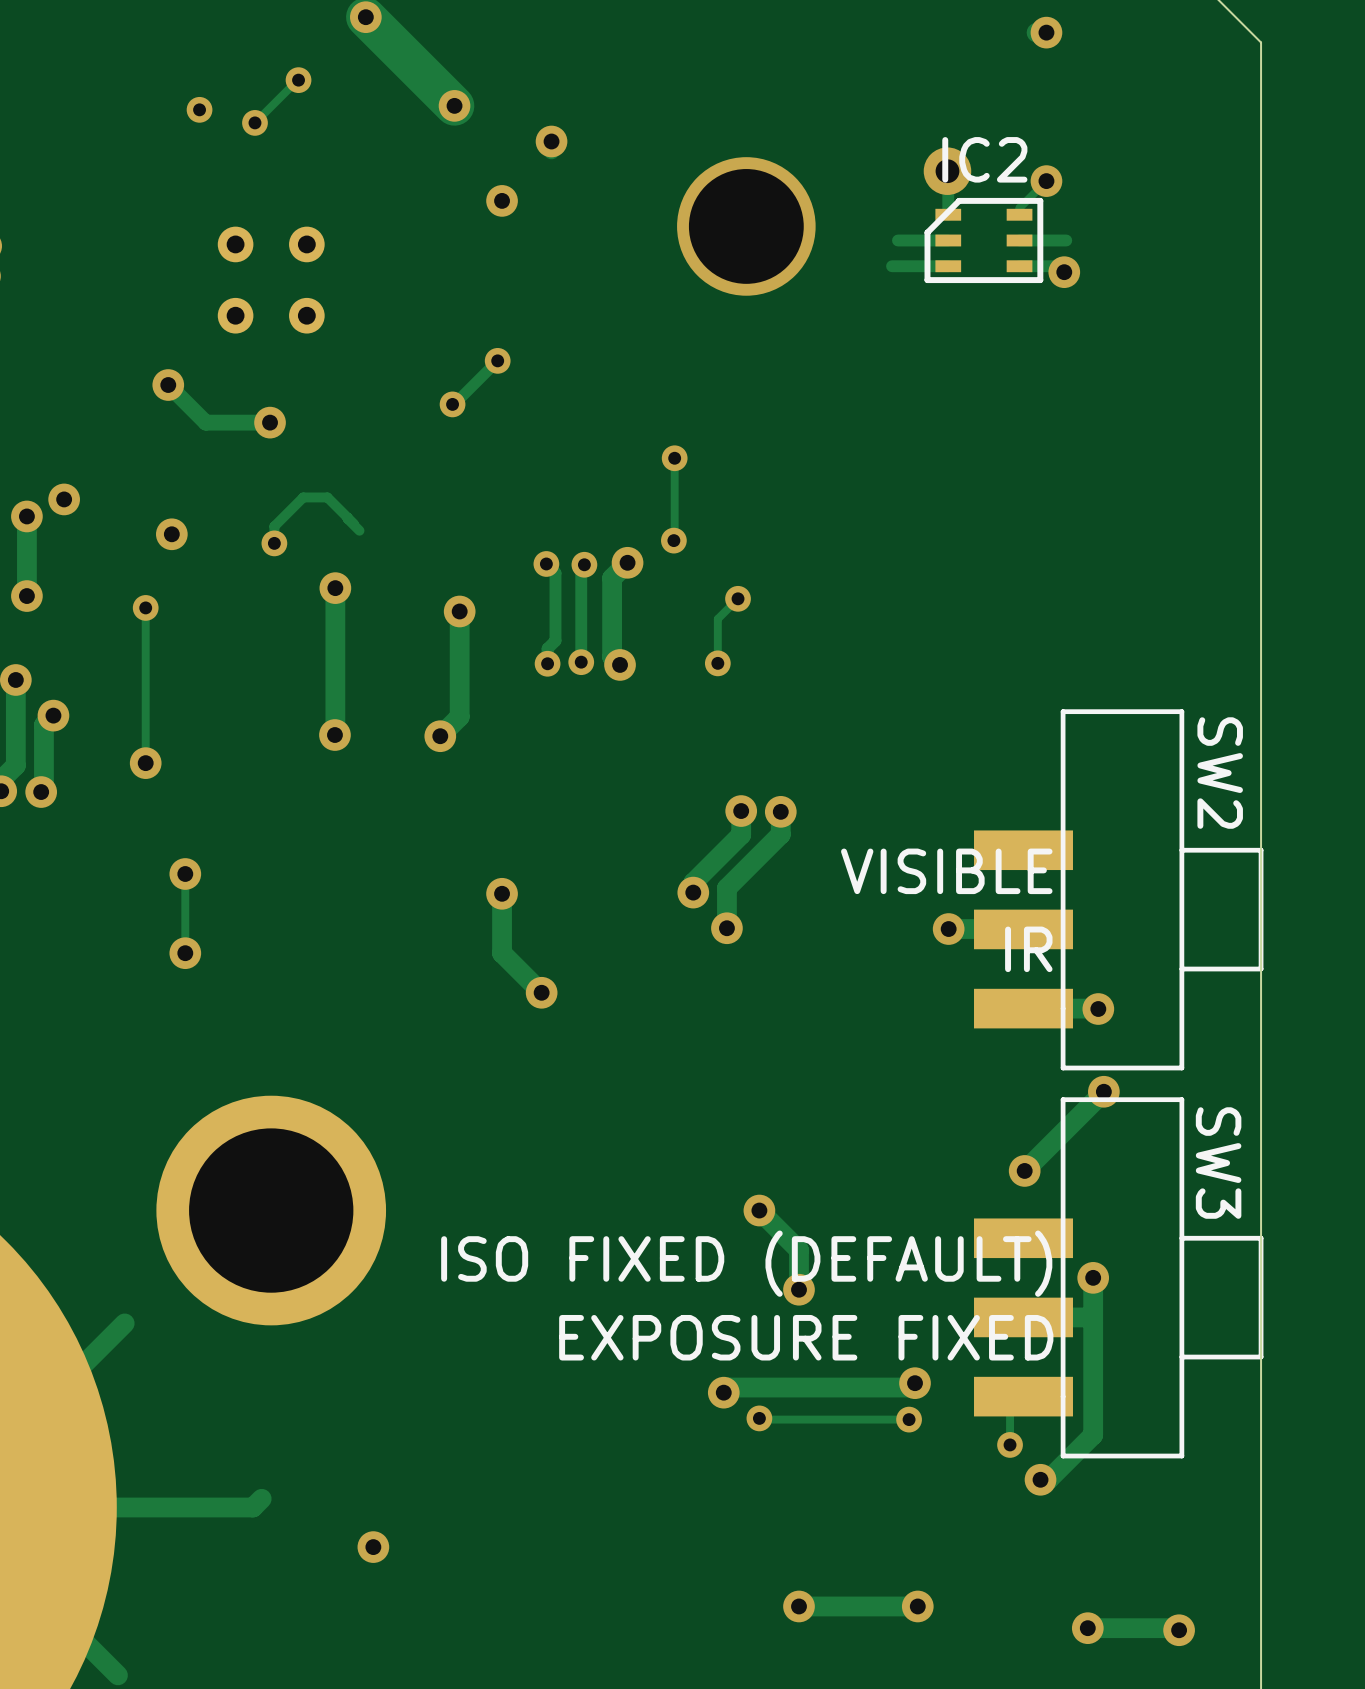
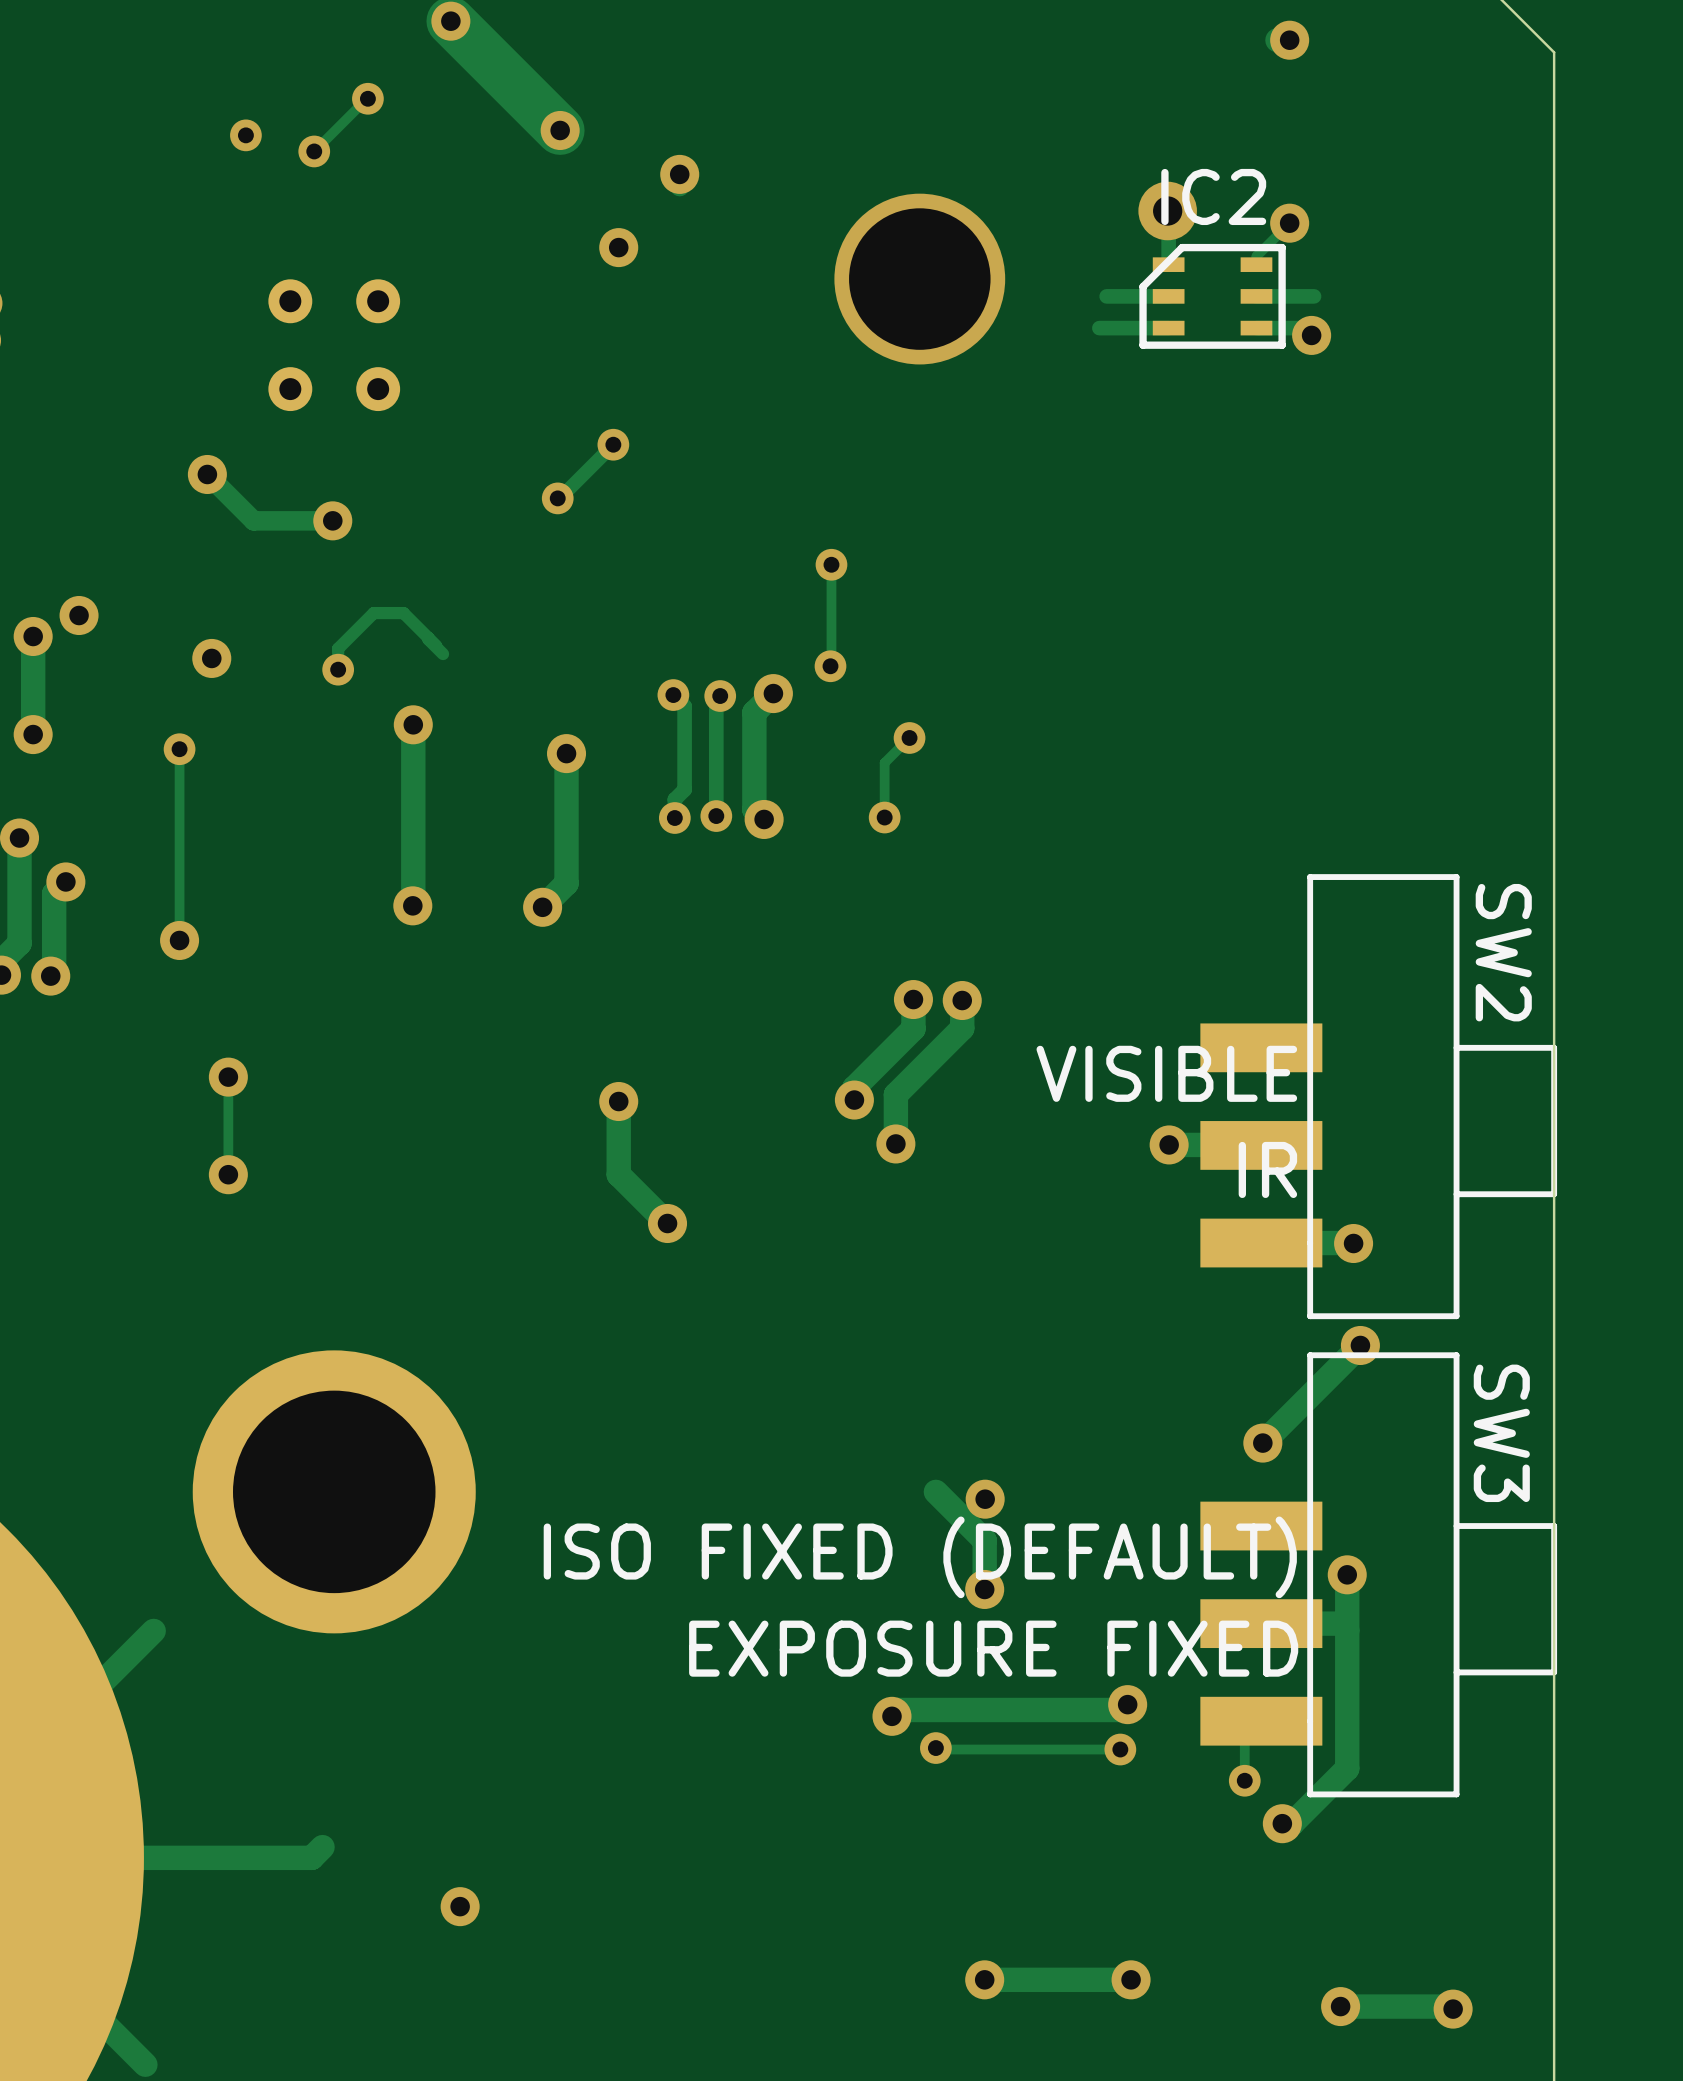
via position: (759, 1210) -> (985, 1499)

